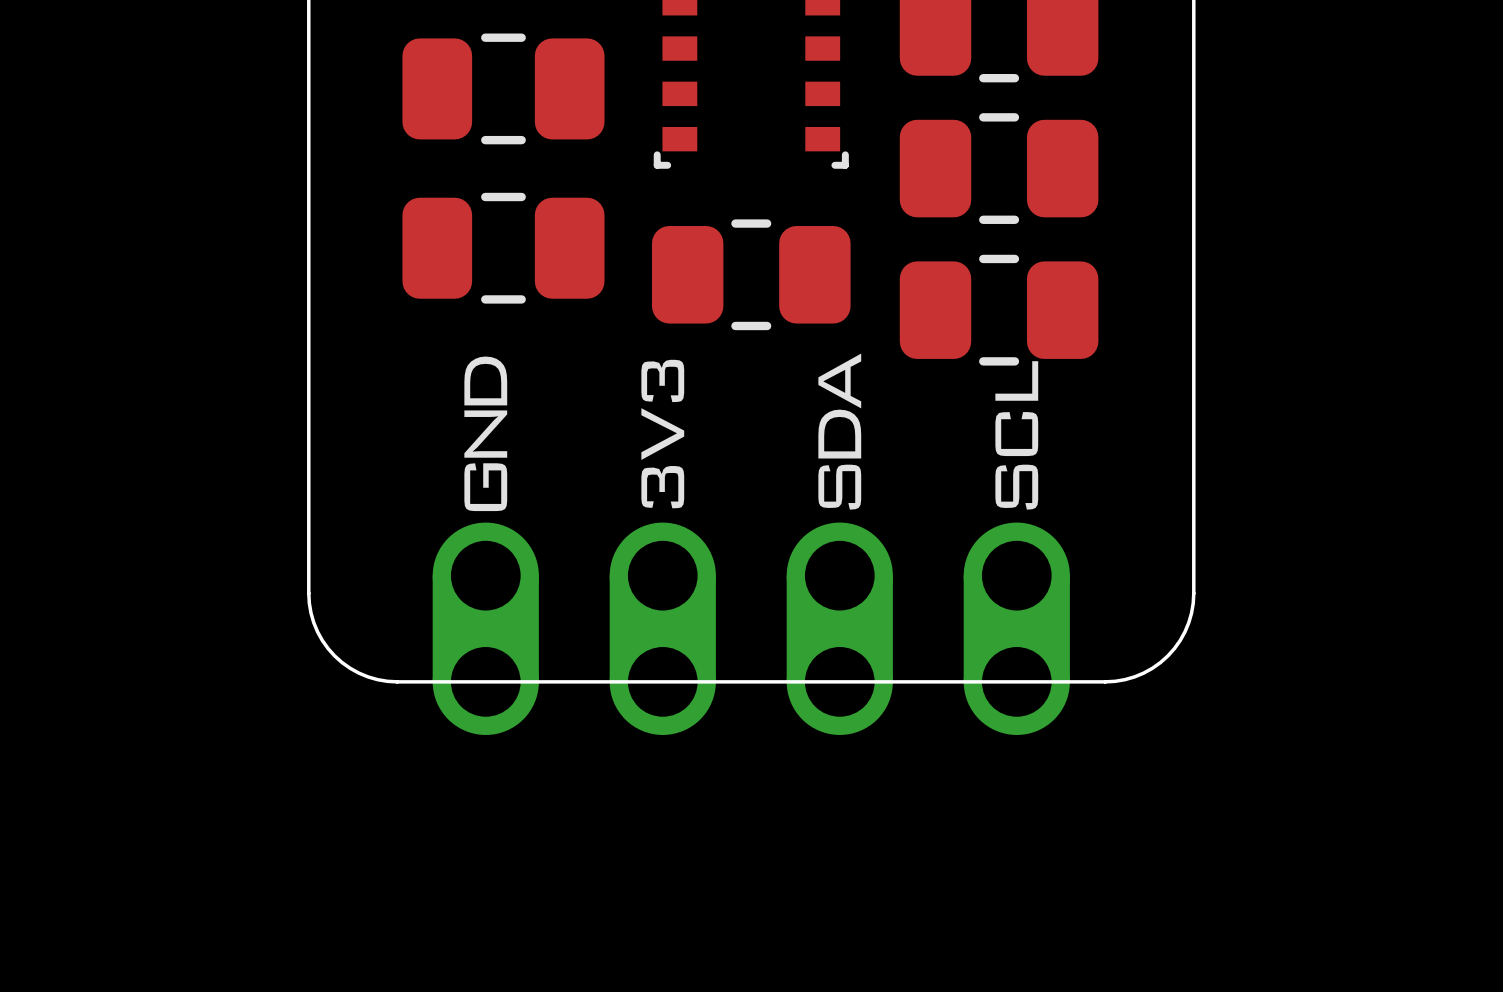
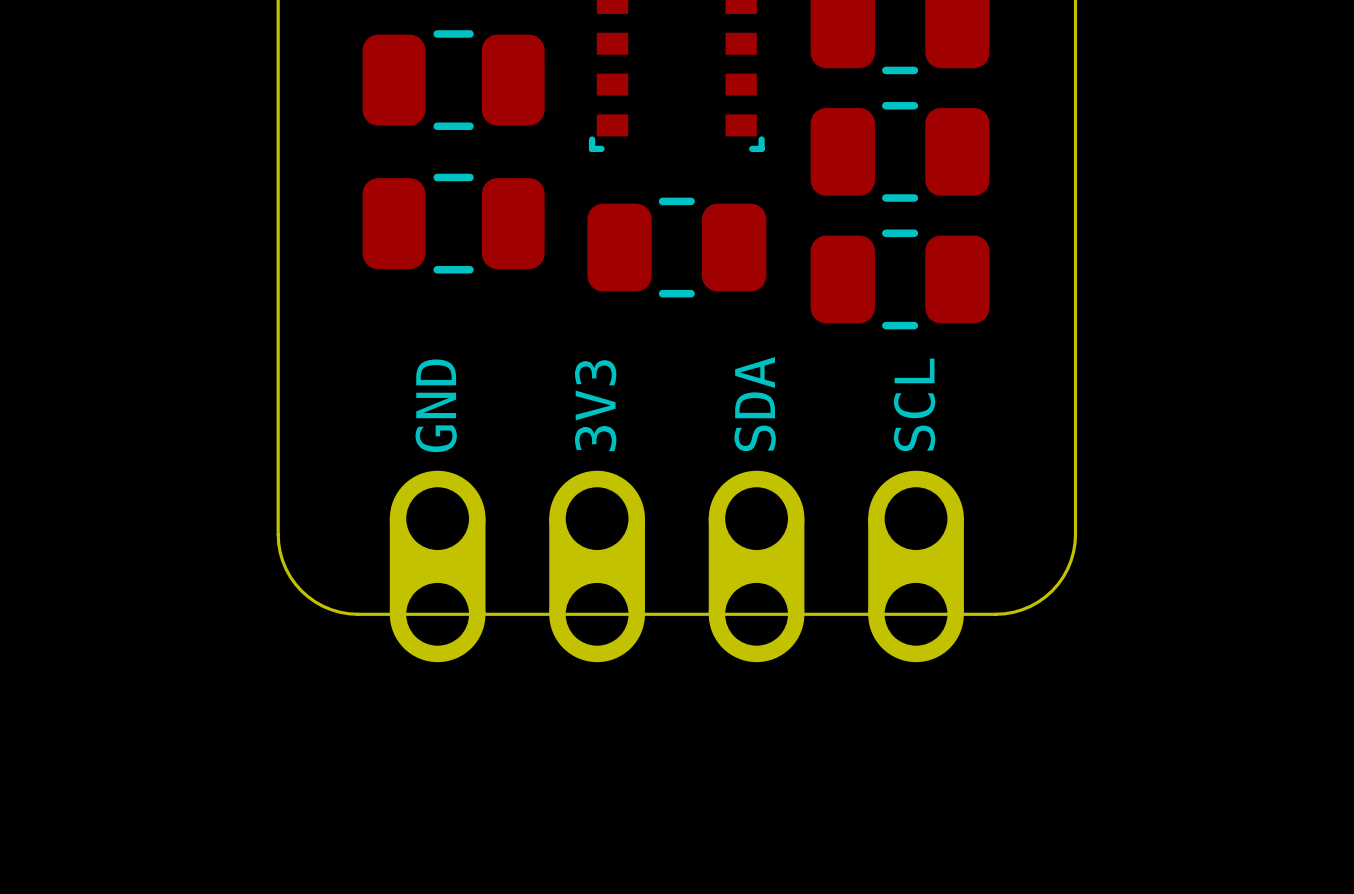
drawing: [818, 353, 862, 510] -> none
drawing: [464, 356, 508, 512] -> none
drawing: [641, 359, 685, 509] -> none
drawing: [995, 361, 1039, 510] -> none
text: none -> GND (436, 405)
text: none -> SDA (755, 404)
text: none -> SCL (914, 404)
text: none -> 3V3 (595, 405)

